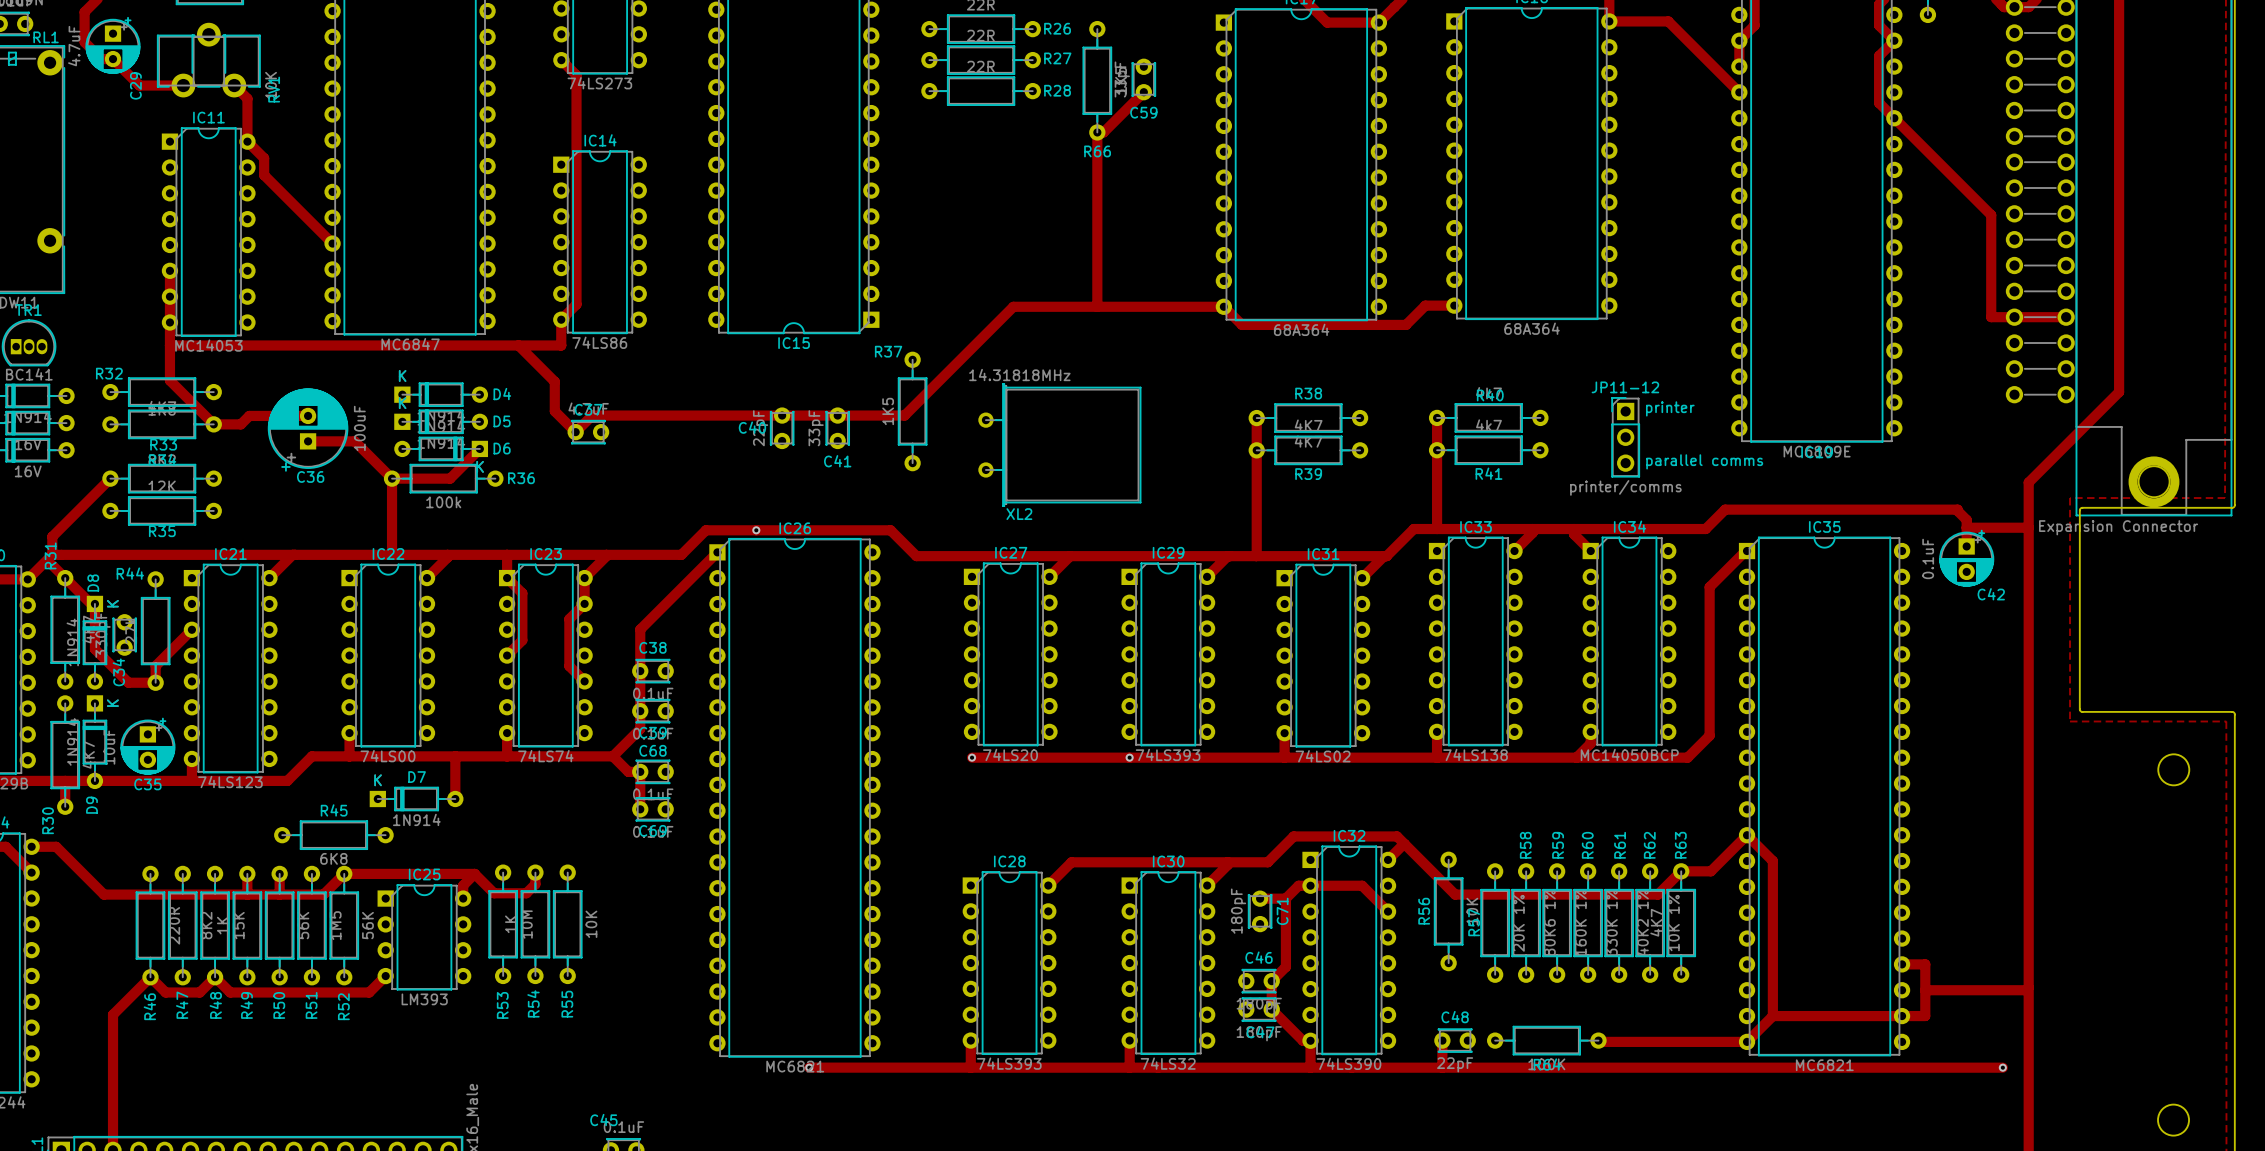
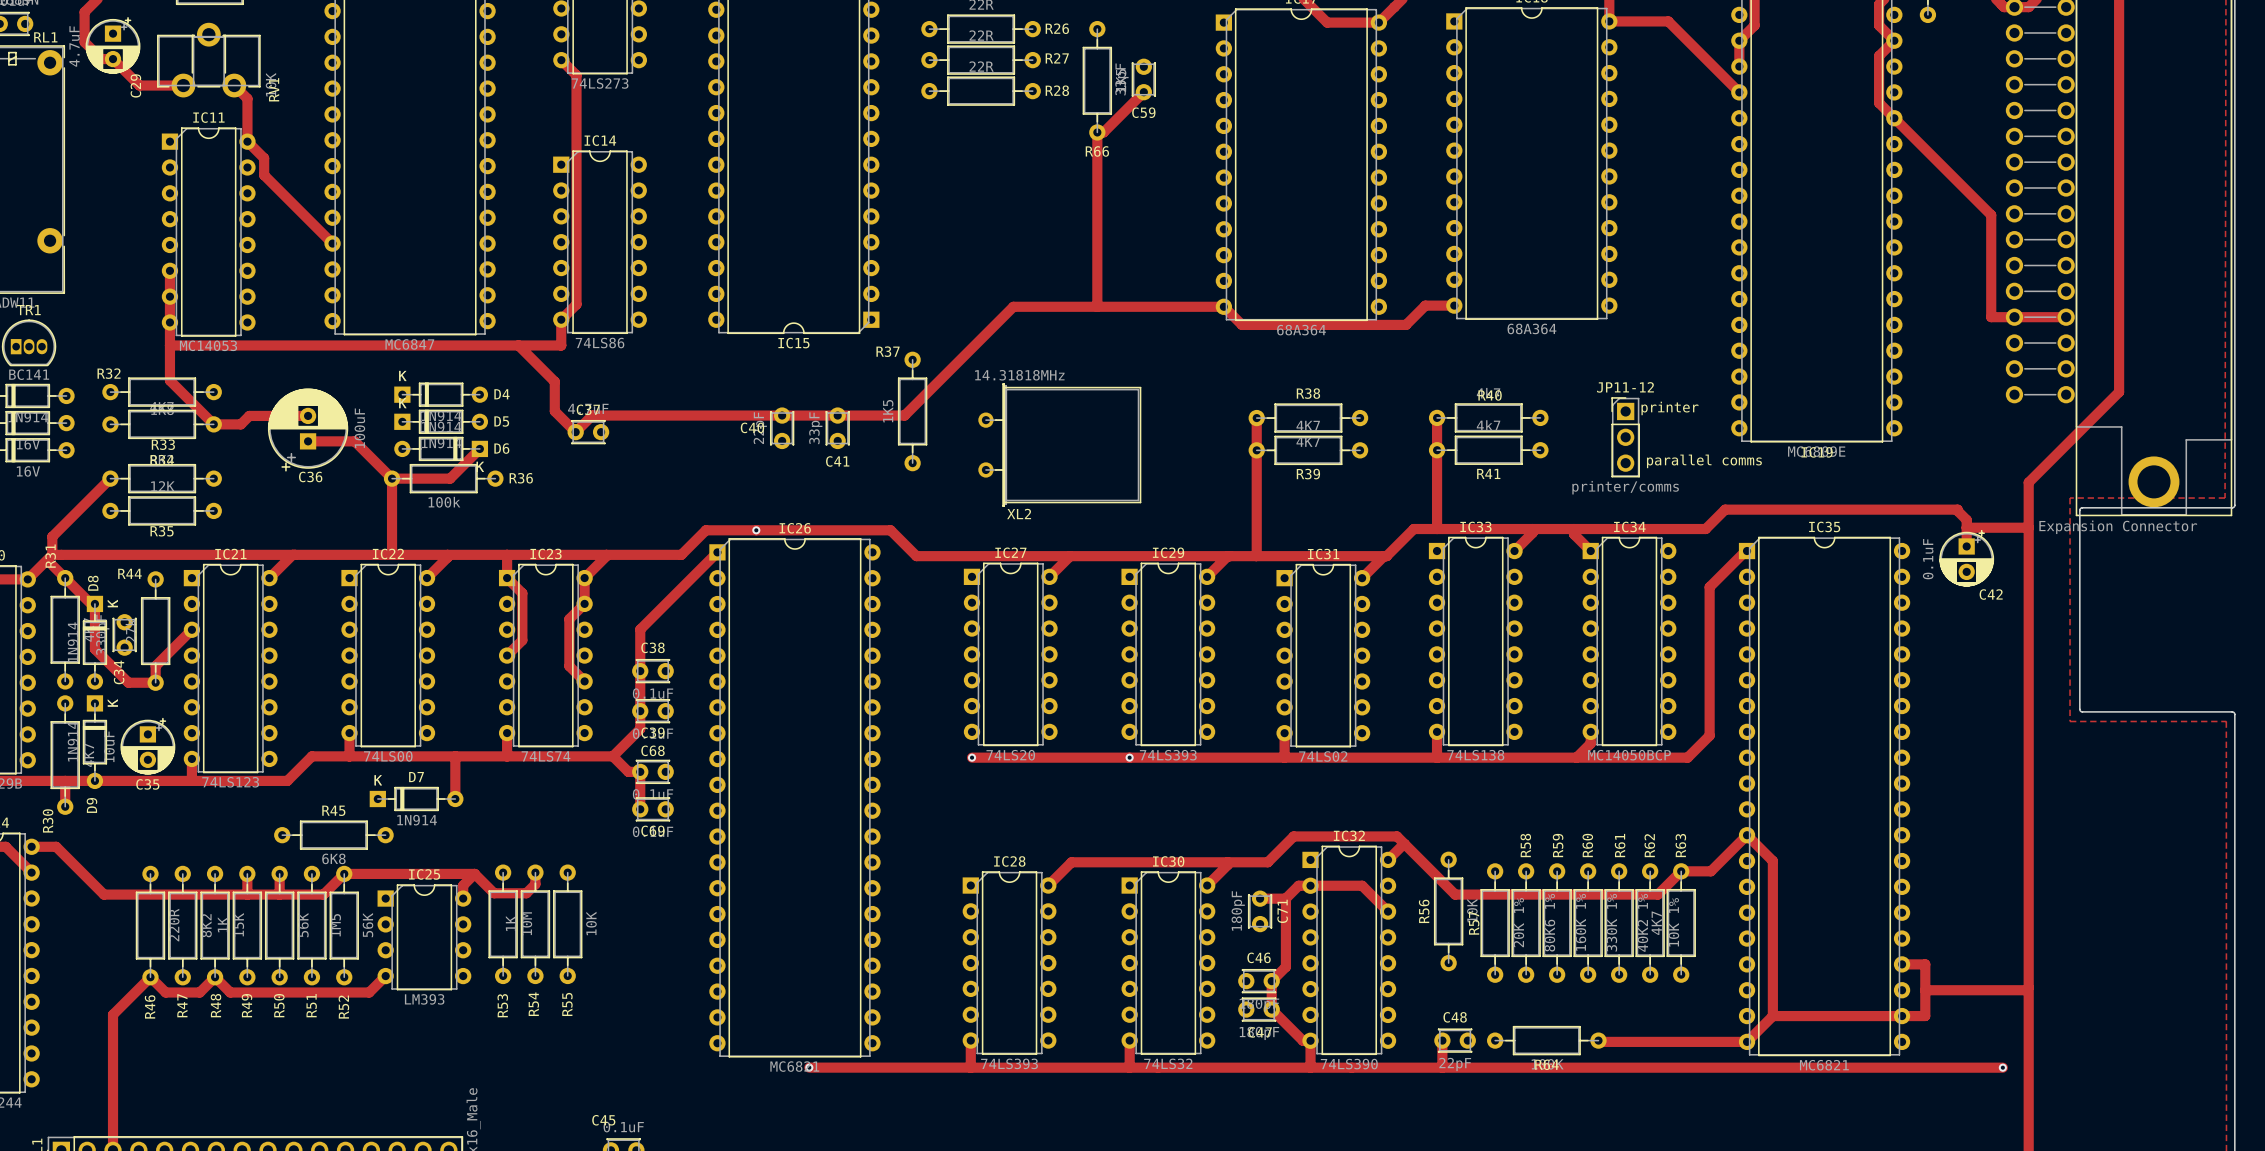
round board edge: [2138, 465, 2171, 498] -> none
round board edge: [2157, 753, 2190, 786] -> none
round board edge: [2157, 1104, 2190, 1137] -> none

